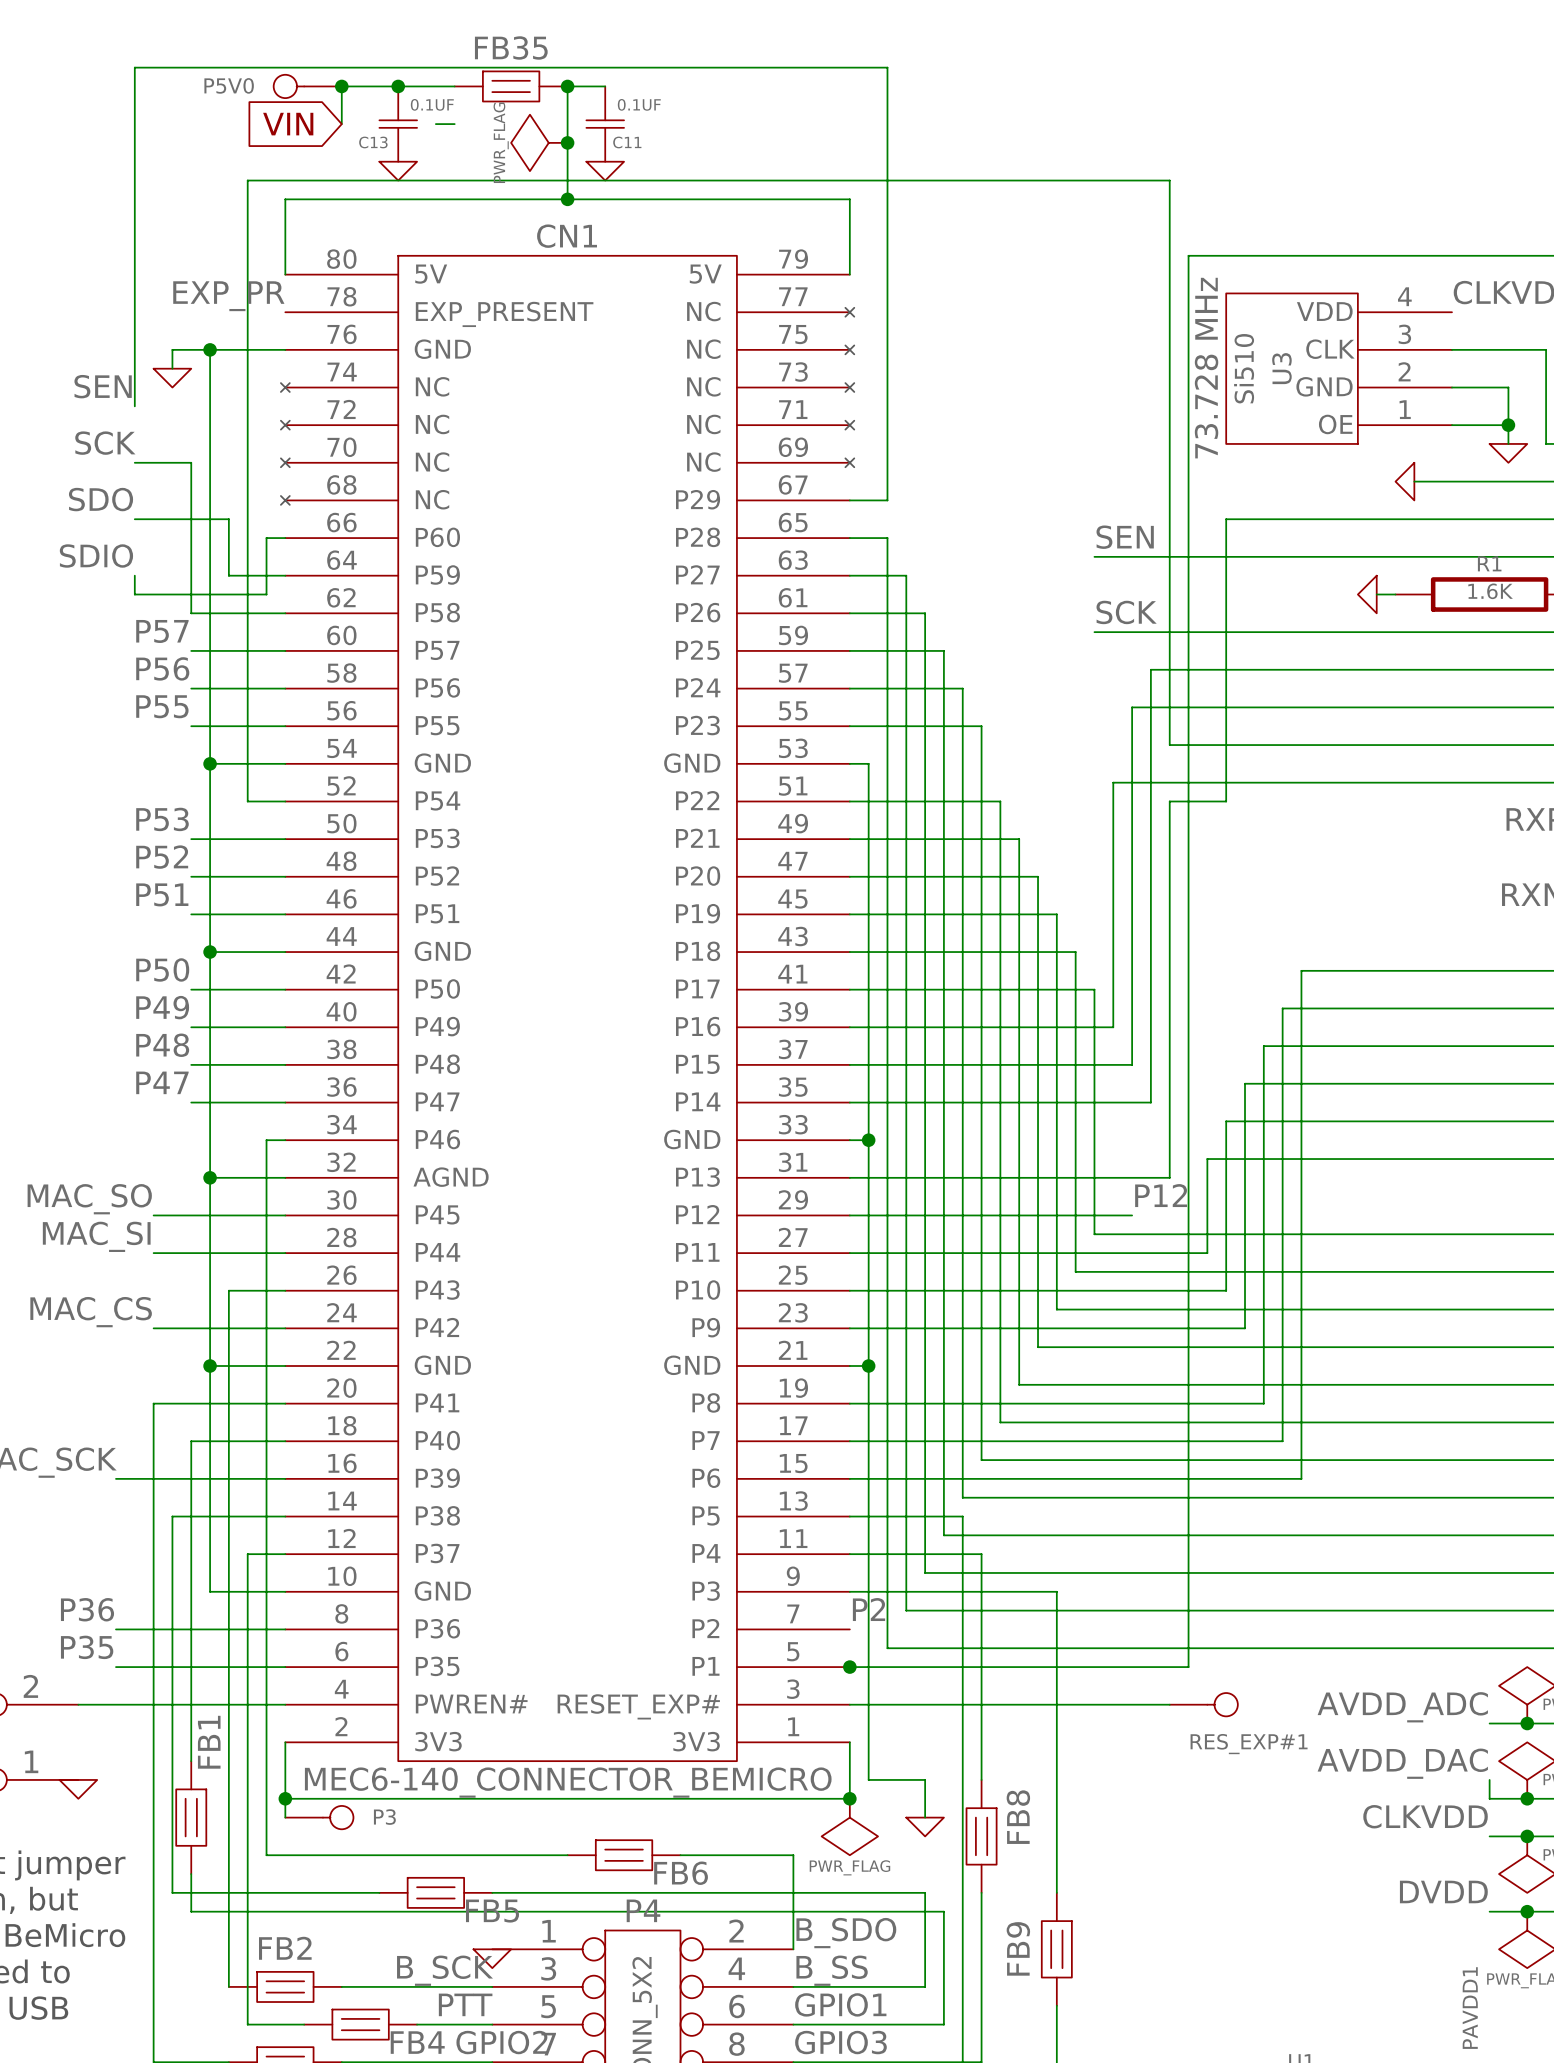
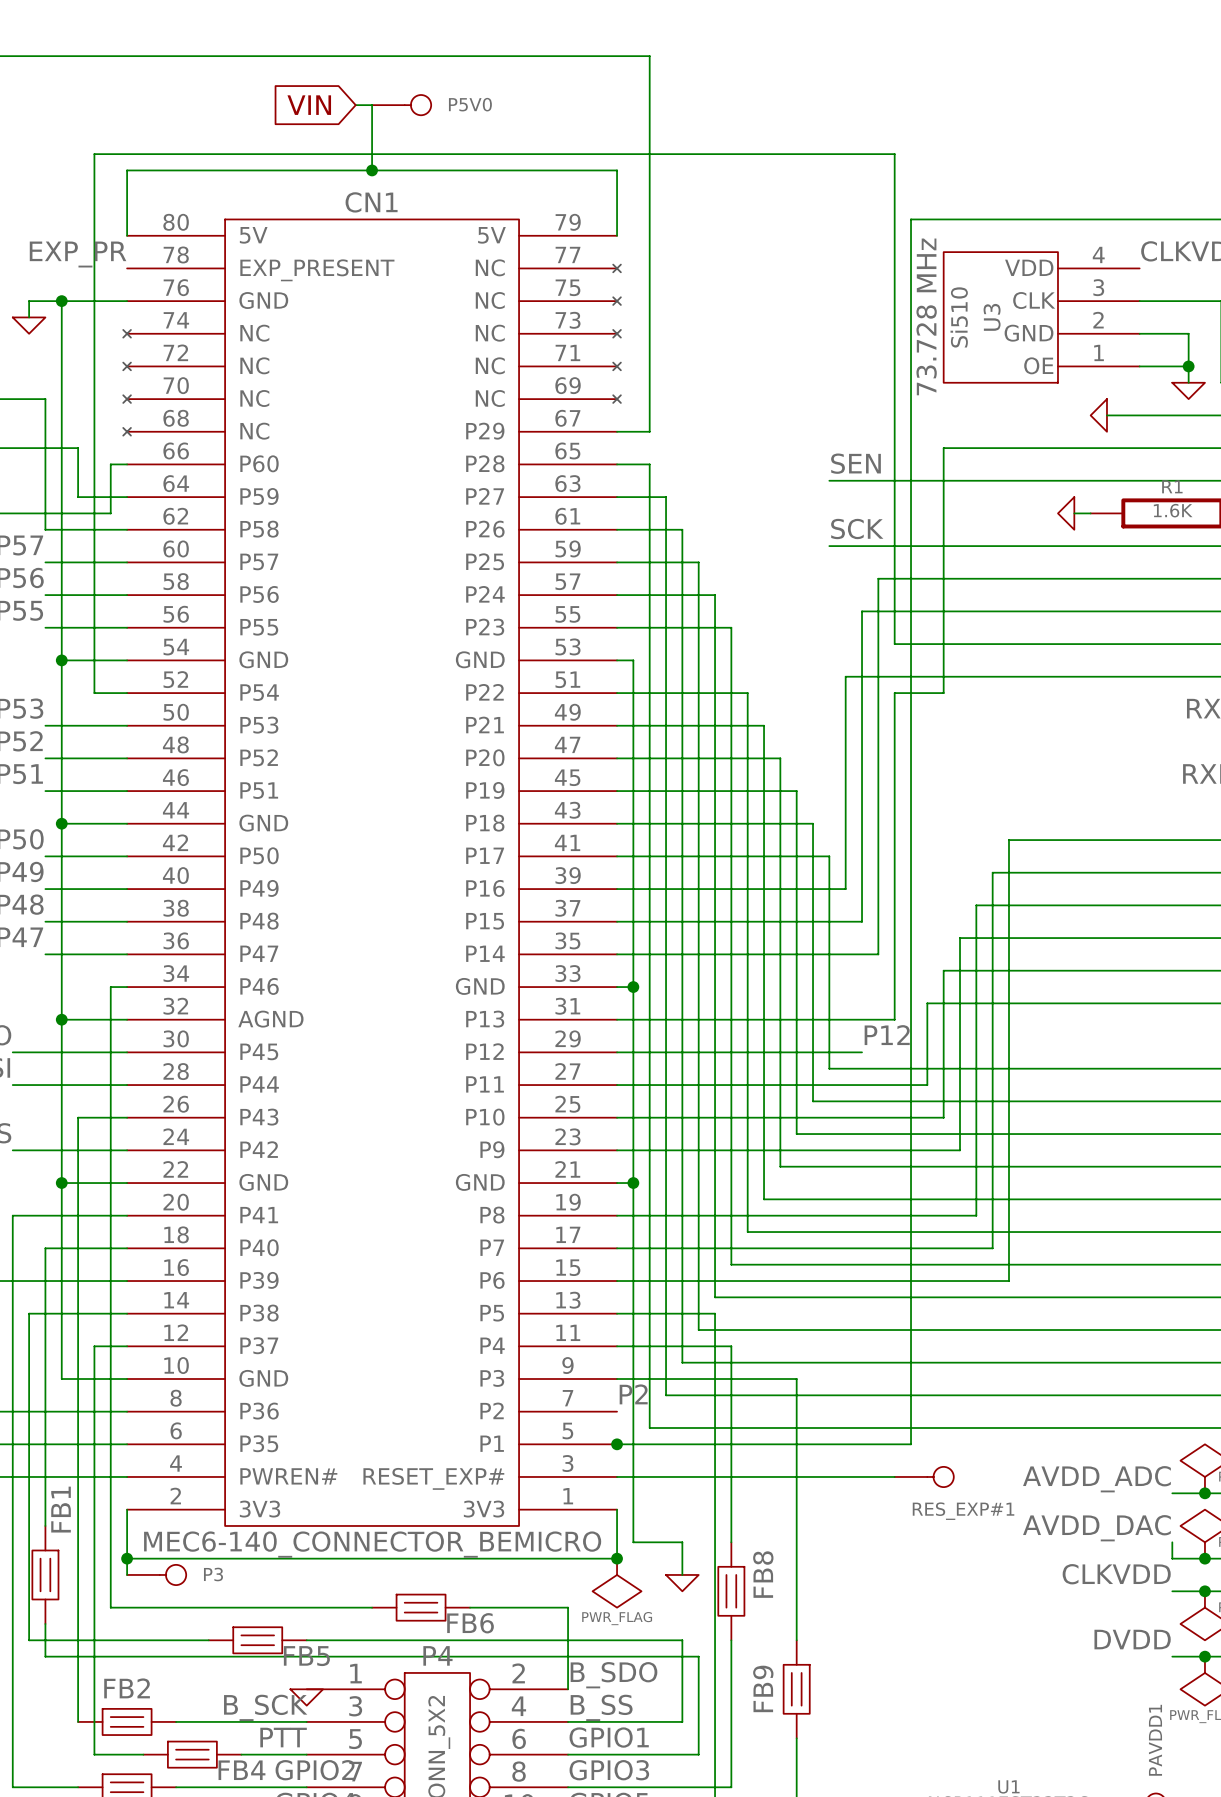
P5V0 rotation: 0° (288, 86) -> 180° (417, 105)
P5V0 position: (307, 86) -> (401, 105)
junction: (341, 86) -> none
junction: (398, 86) -> none
wire: (454, 86) (341, 86) (341, 124) -> none
FB35: (511, 86) -> none
junction: (567, 86) -> none
wire: (605, 86) (567, 86) (567, 124) -> (355, 105) (372, 105)
global label position: VIN (288, 124) -> VIN (309, 105)
C13: 0.1UF (398, 124) -> none
wire: (435, 124) (454, 124) -> none
C11: 0.1UF (605, 124) -> none
power symbol: PWR_FLAG (539, 142) -> none
junction: (567, 142) -> none
power symbol: (398, 171) -> none
power symbol: (605, 171) -> none

